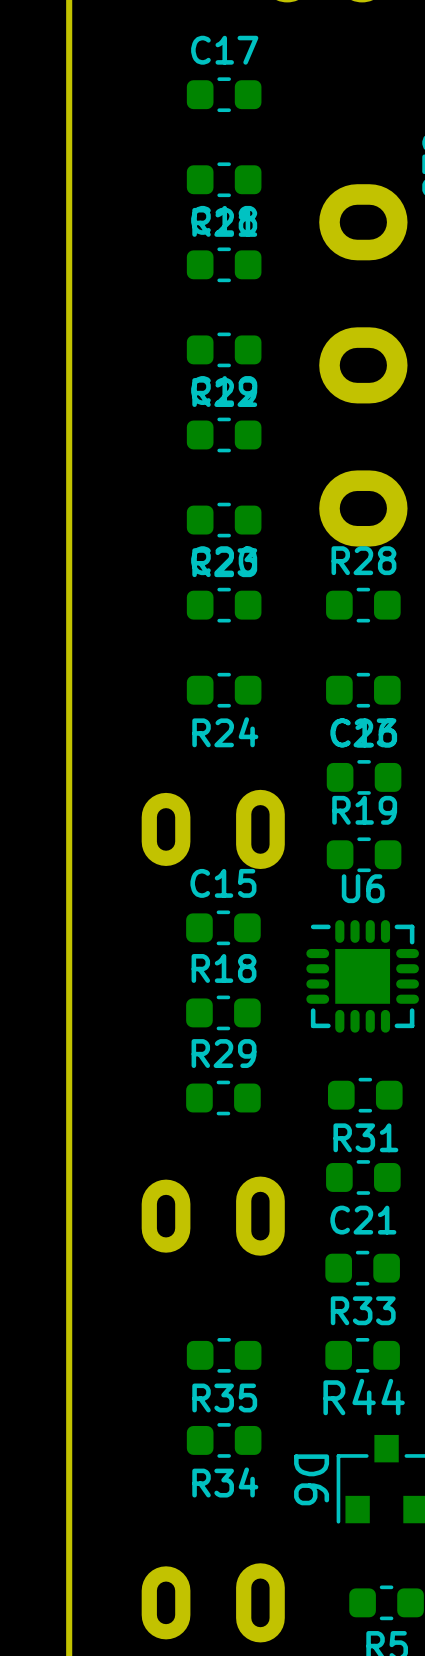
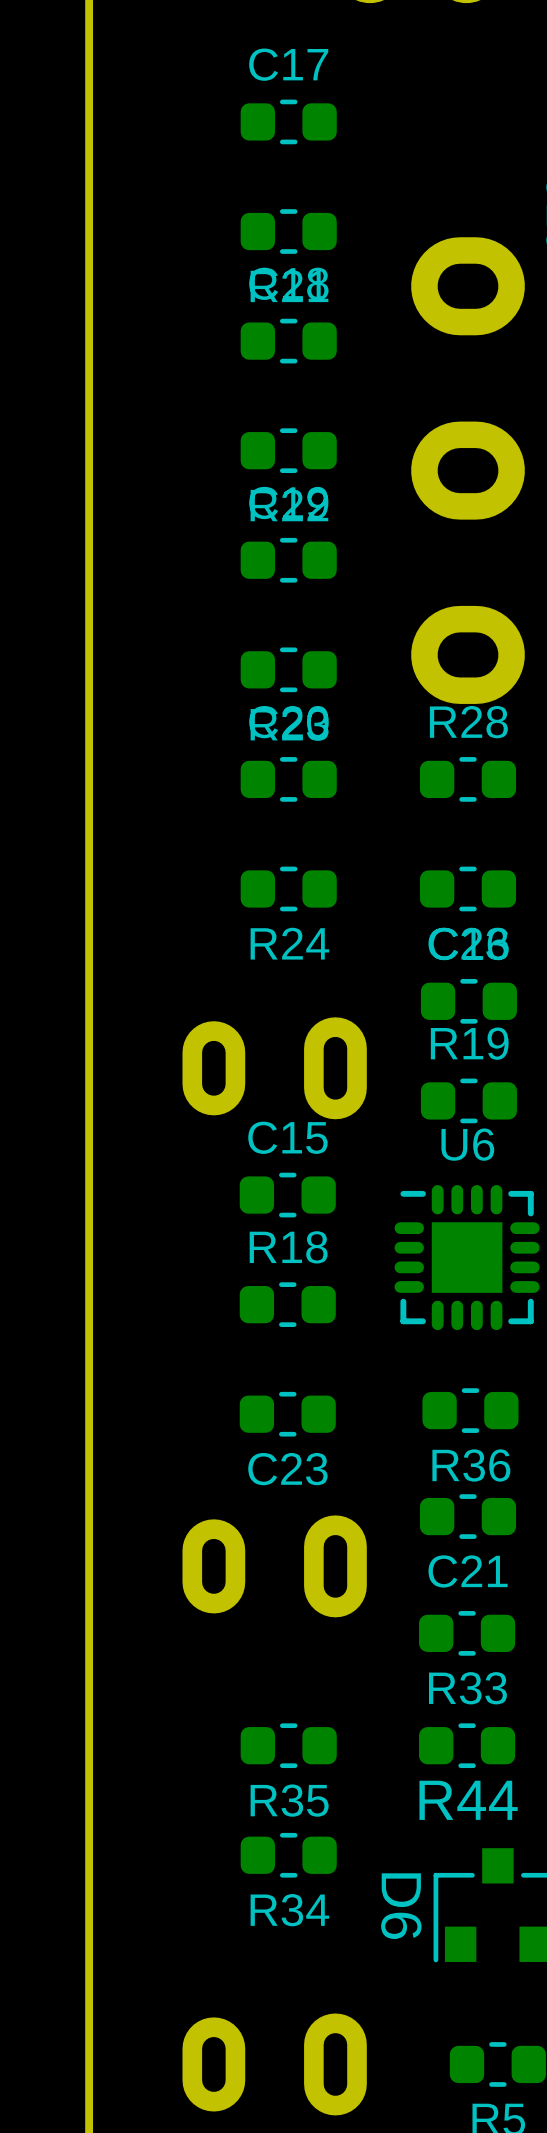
R29 name: R29 (224, 1053) -> C23 (287, 1469)
R31 name: R31 (365, 1137) -> R36 (471, 1465)

